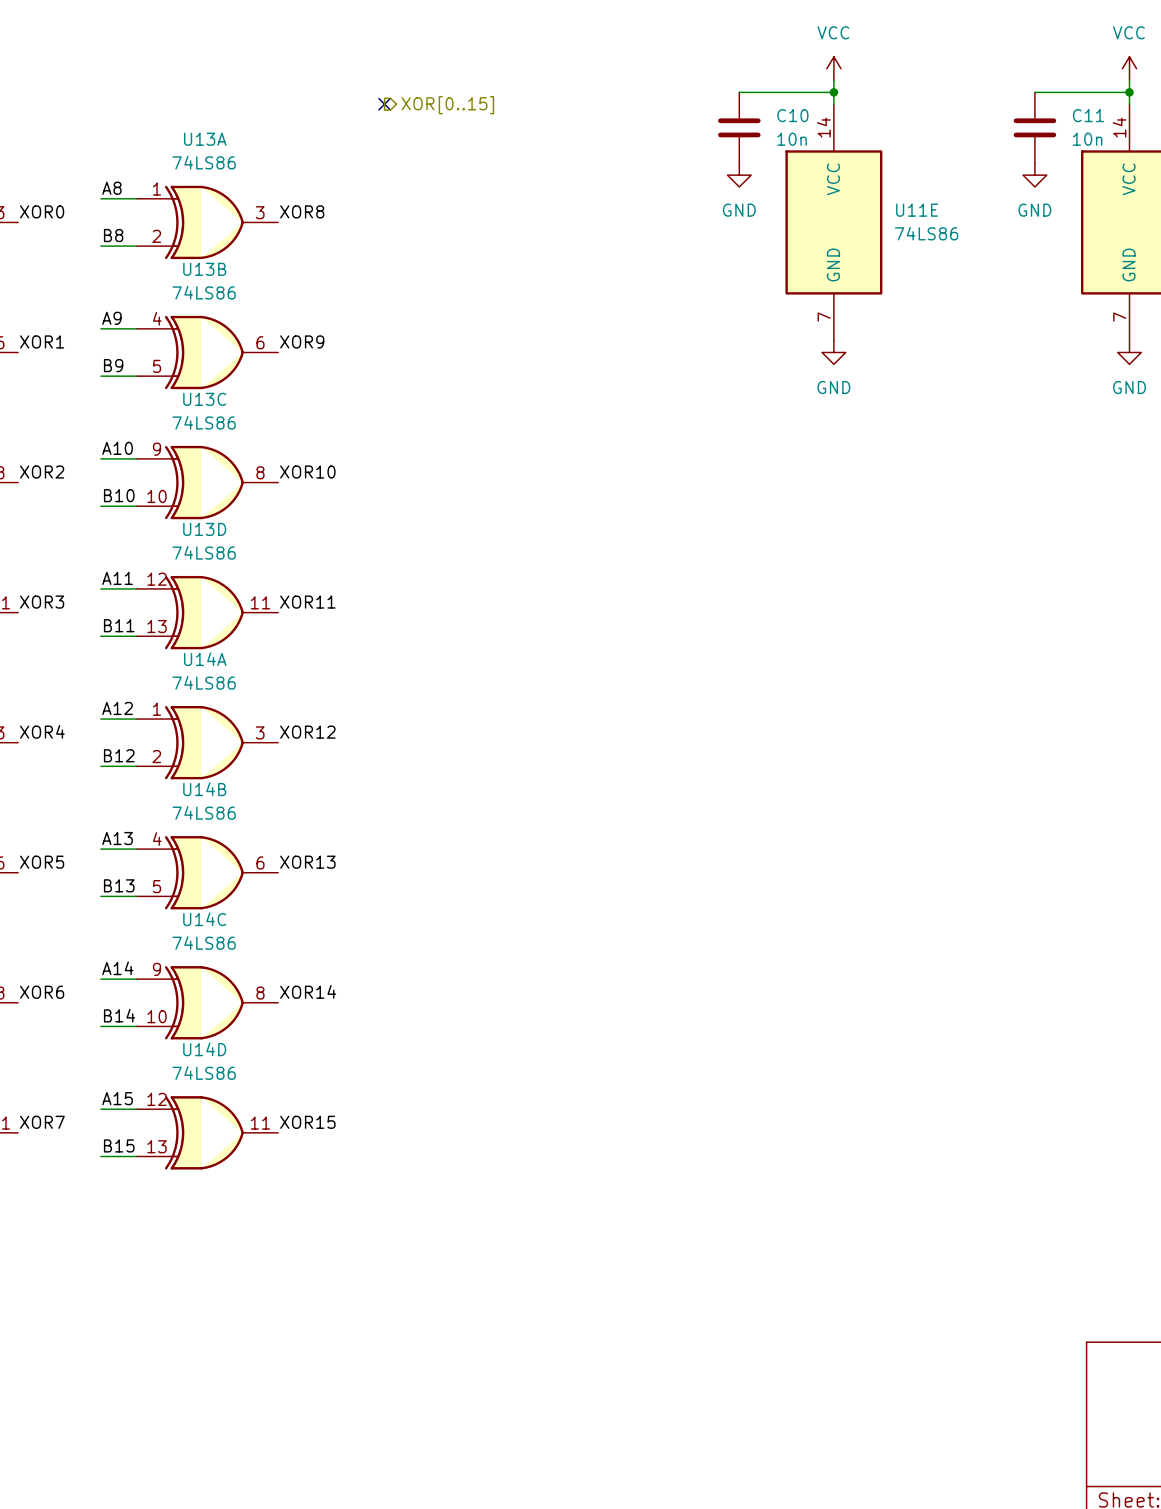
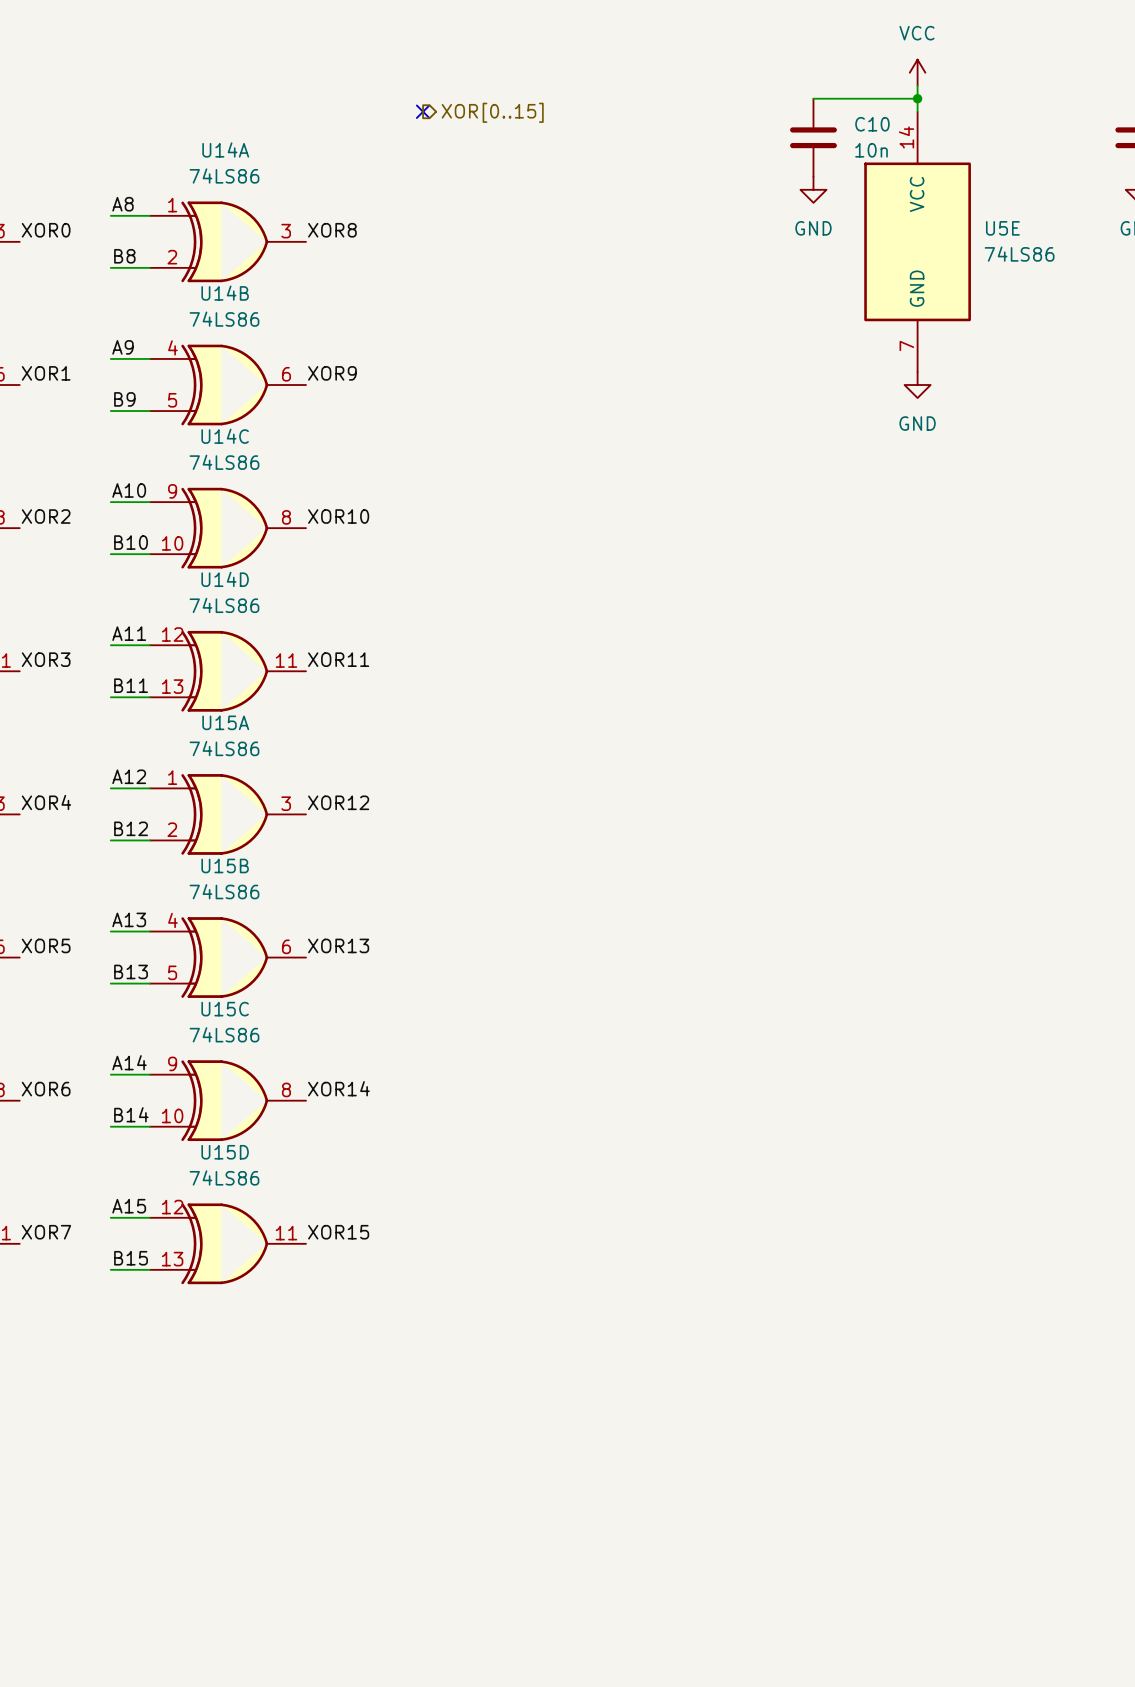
U13A name: U13A (205, 139) -> U14A (225, 149)
U11E name: U11E (917, 210) -> U5E (1002, 228)
U13B name: U13B (204, 269) -> U14B (225, 293)
U13C name: U13C (204, 399) -> U14C (225, 436)
U13D name: U13D (204, 529) -> U14D (225, 579)
U14A name: U14A (205, 659) -> U15A (225, 722)
U14B name: U14B (204, 789) -> U15B (225, 865)
U14C name: U14C (204, 919) -> U15C (225, 1009)
U14D name: U14D (204, 1049) -> U15D (225, 1152)

